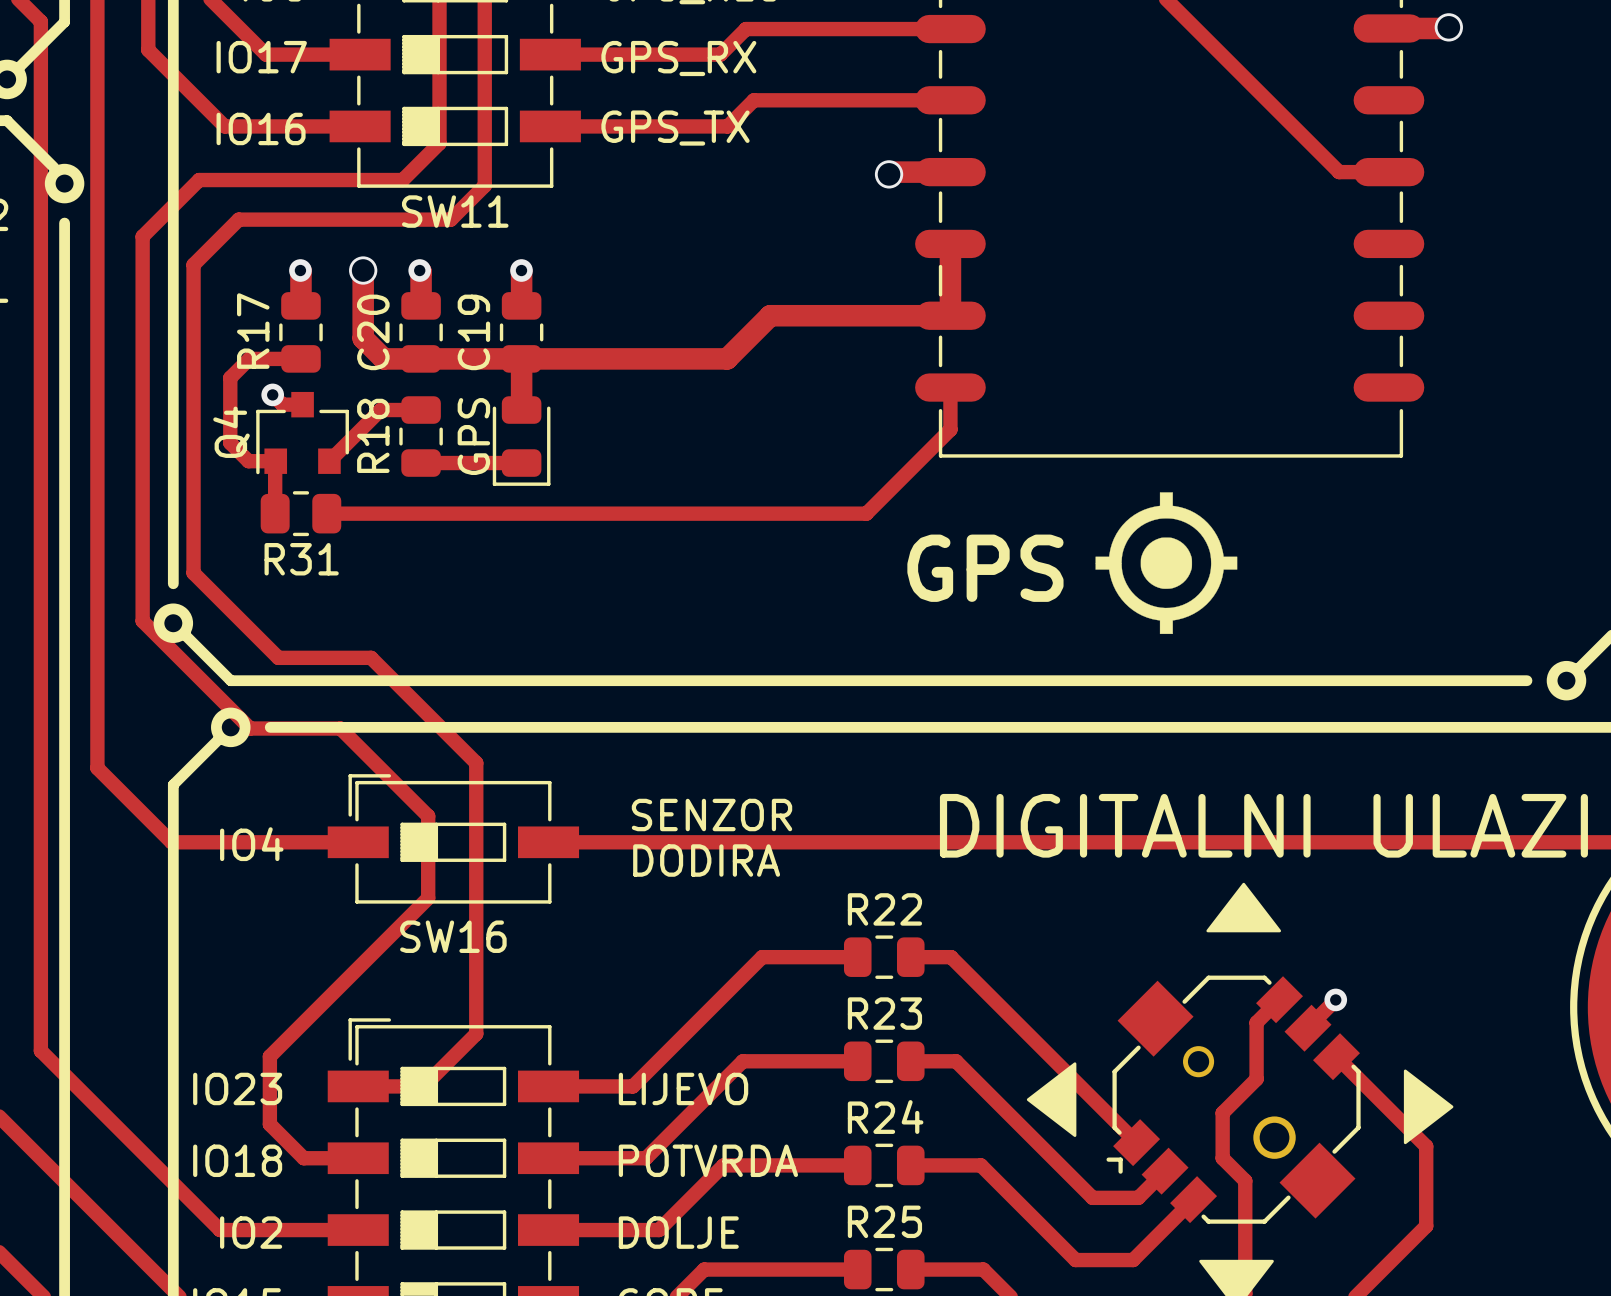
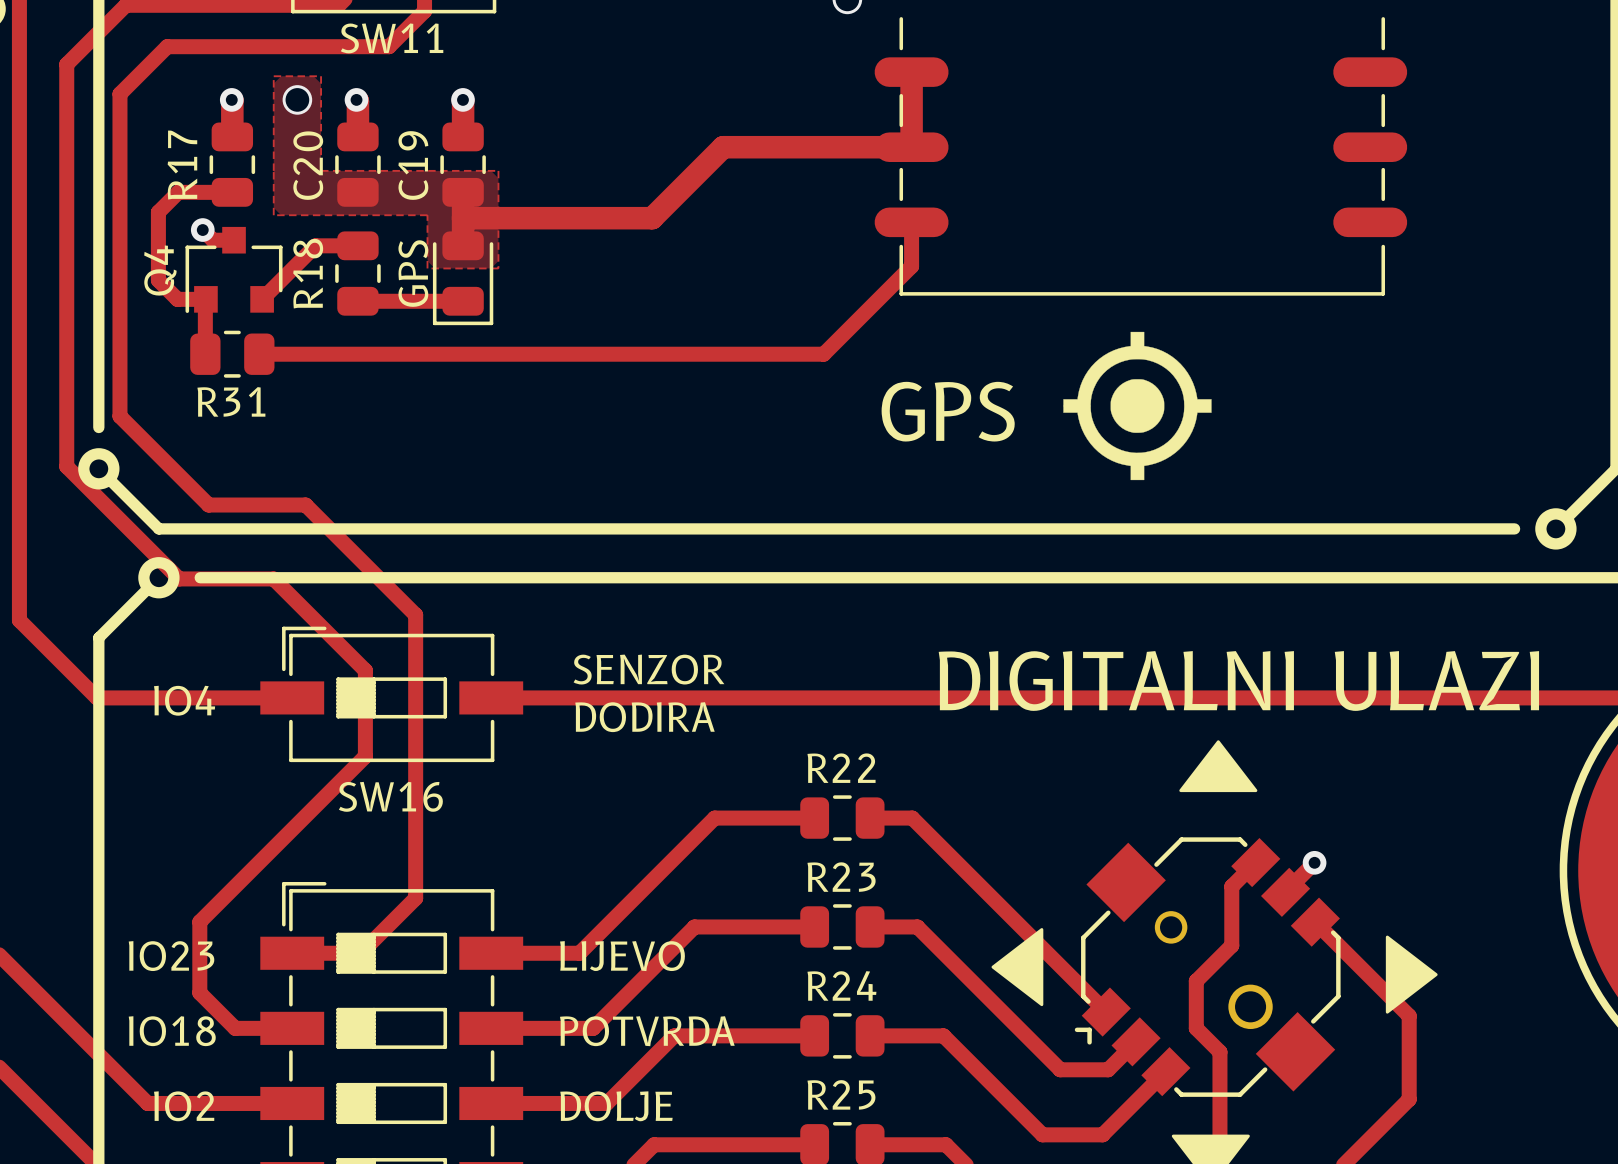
zone outline: none -> (273, 76) (273, 215) (427, 215) (427, 268) (498, 268) (498, 170) (321, 170) (321, 76) (273, 76)
track: (363, 270) (363, 338) (383, 358) (727, 358) -> (462, 218) (652, 218) (678, 192)

